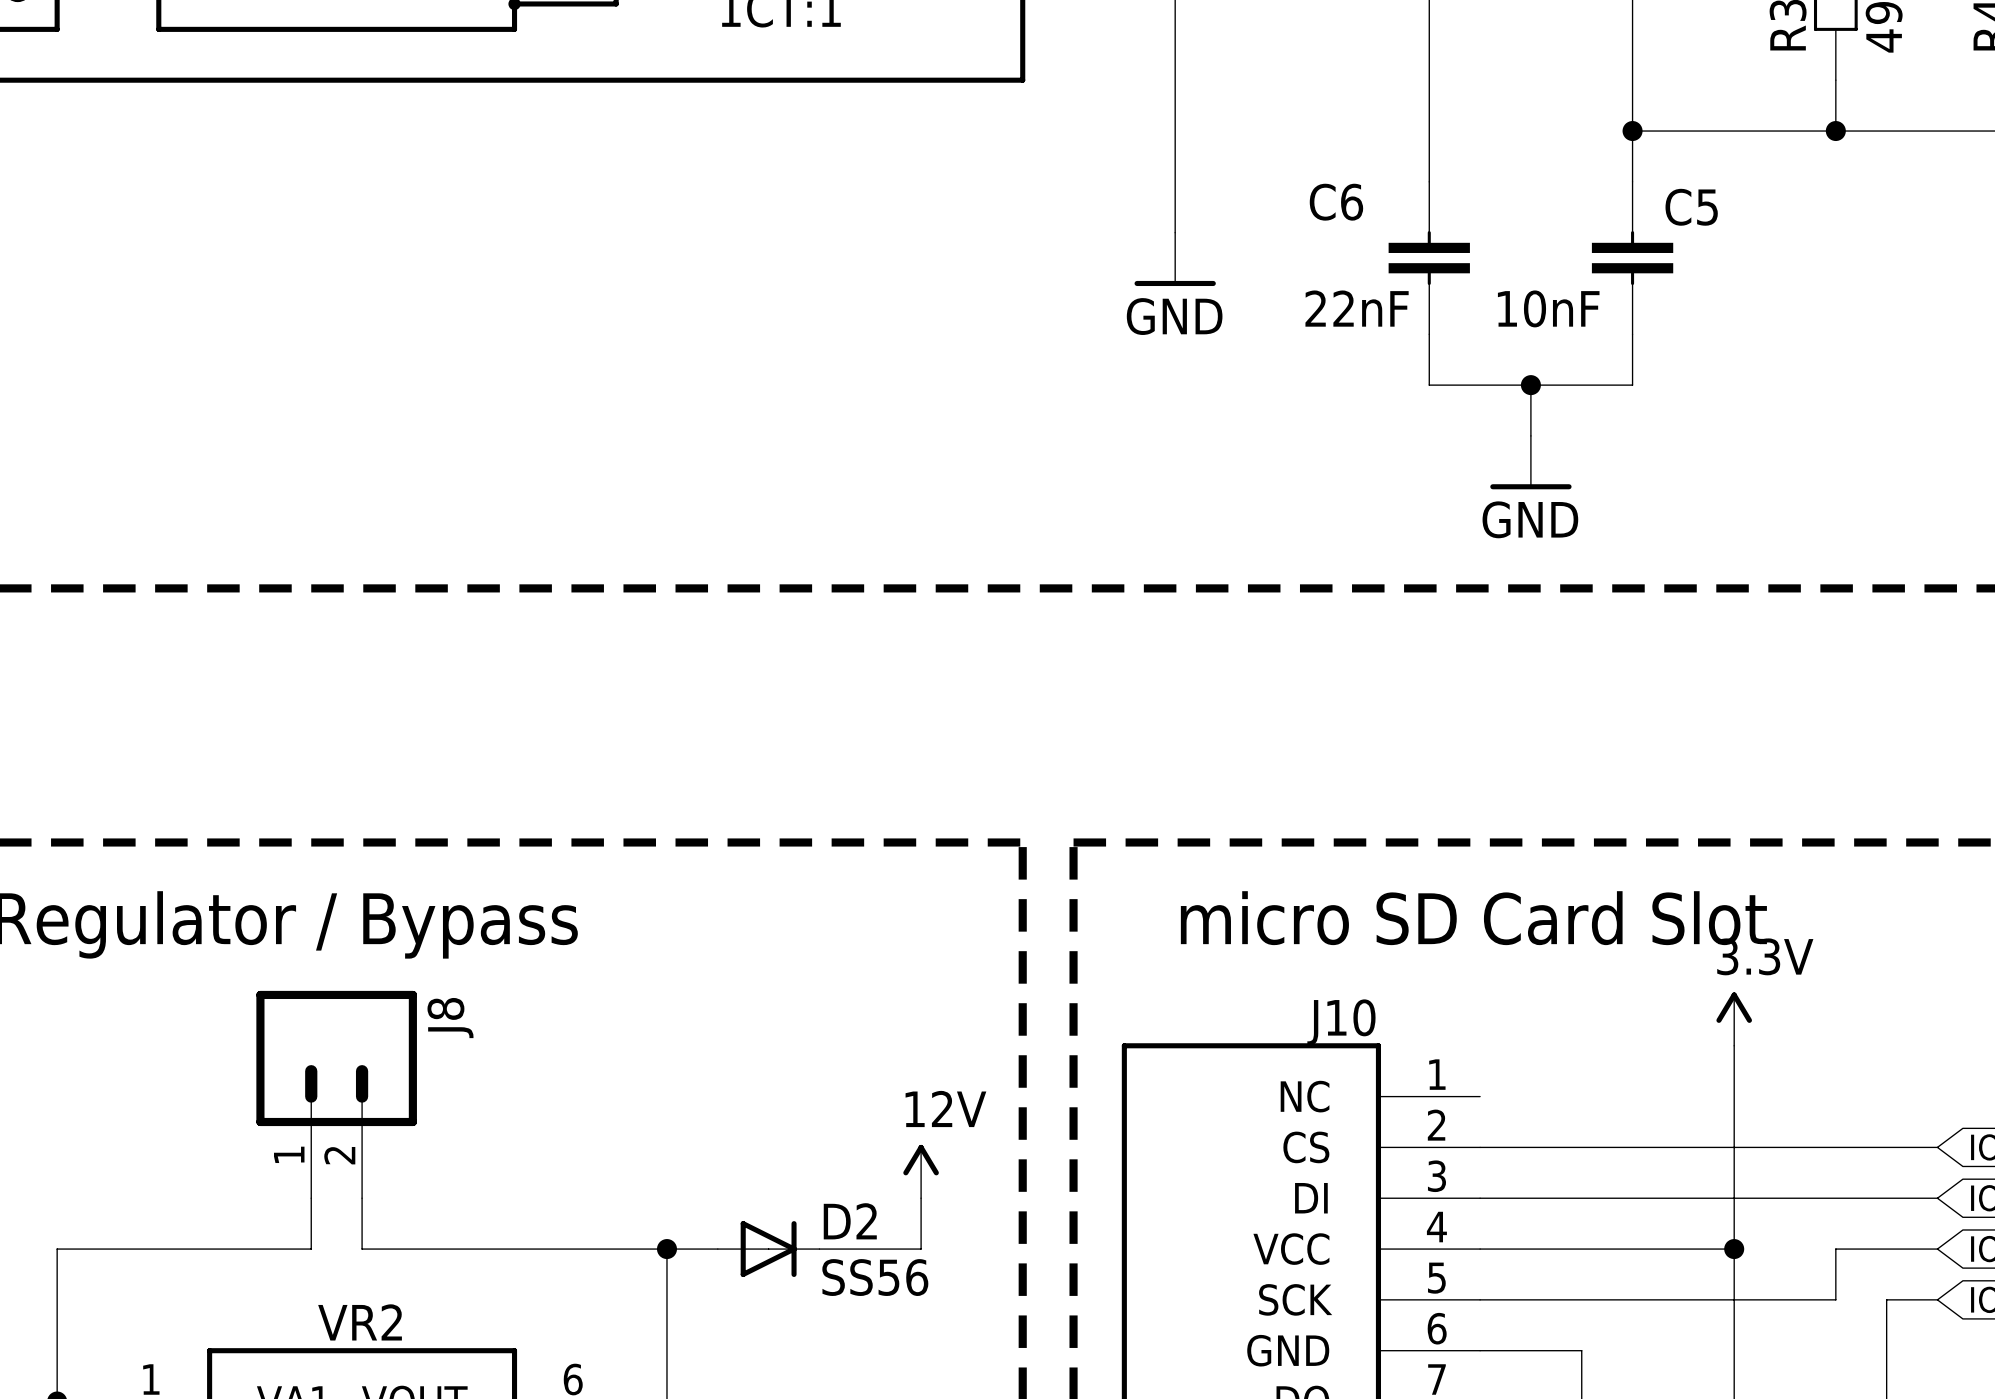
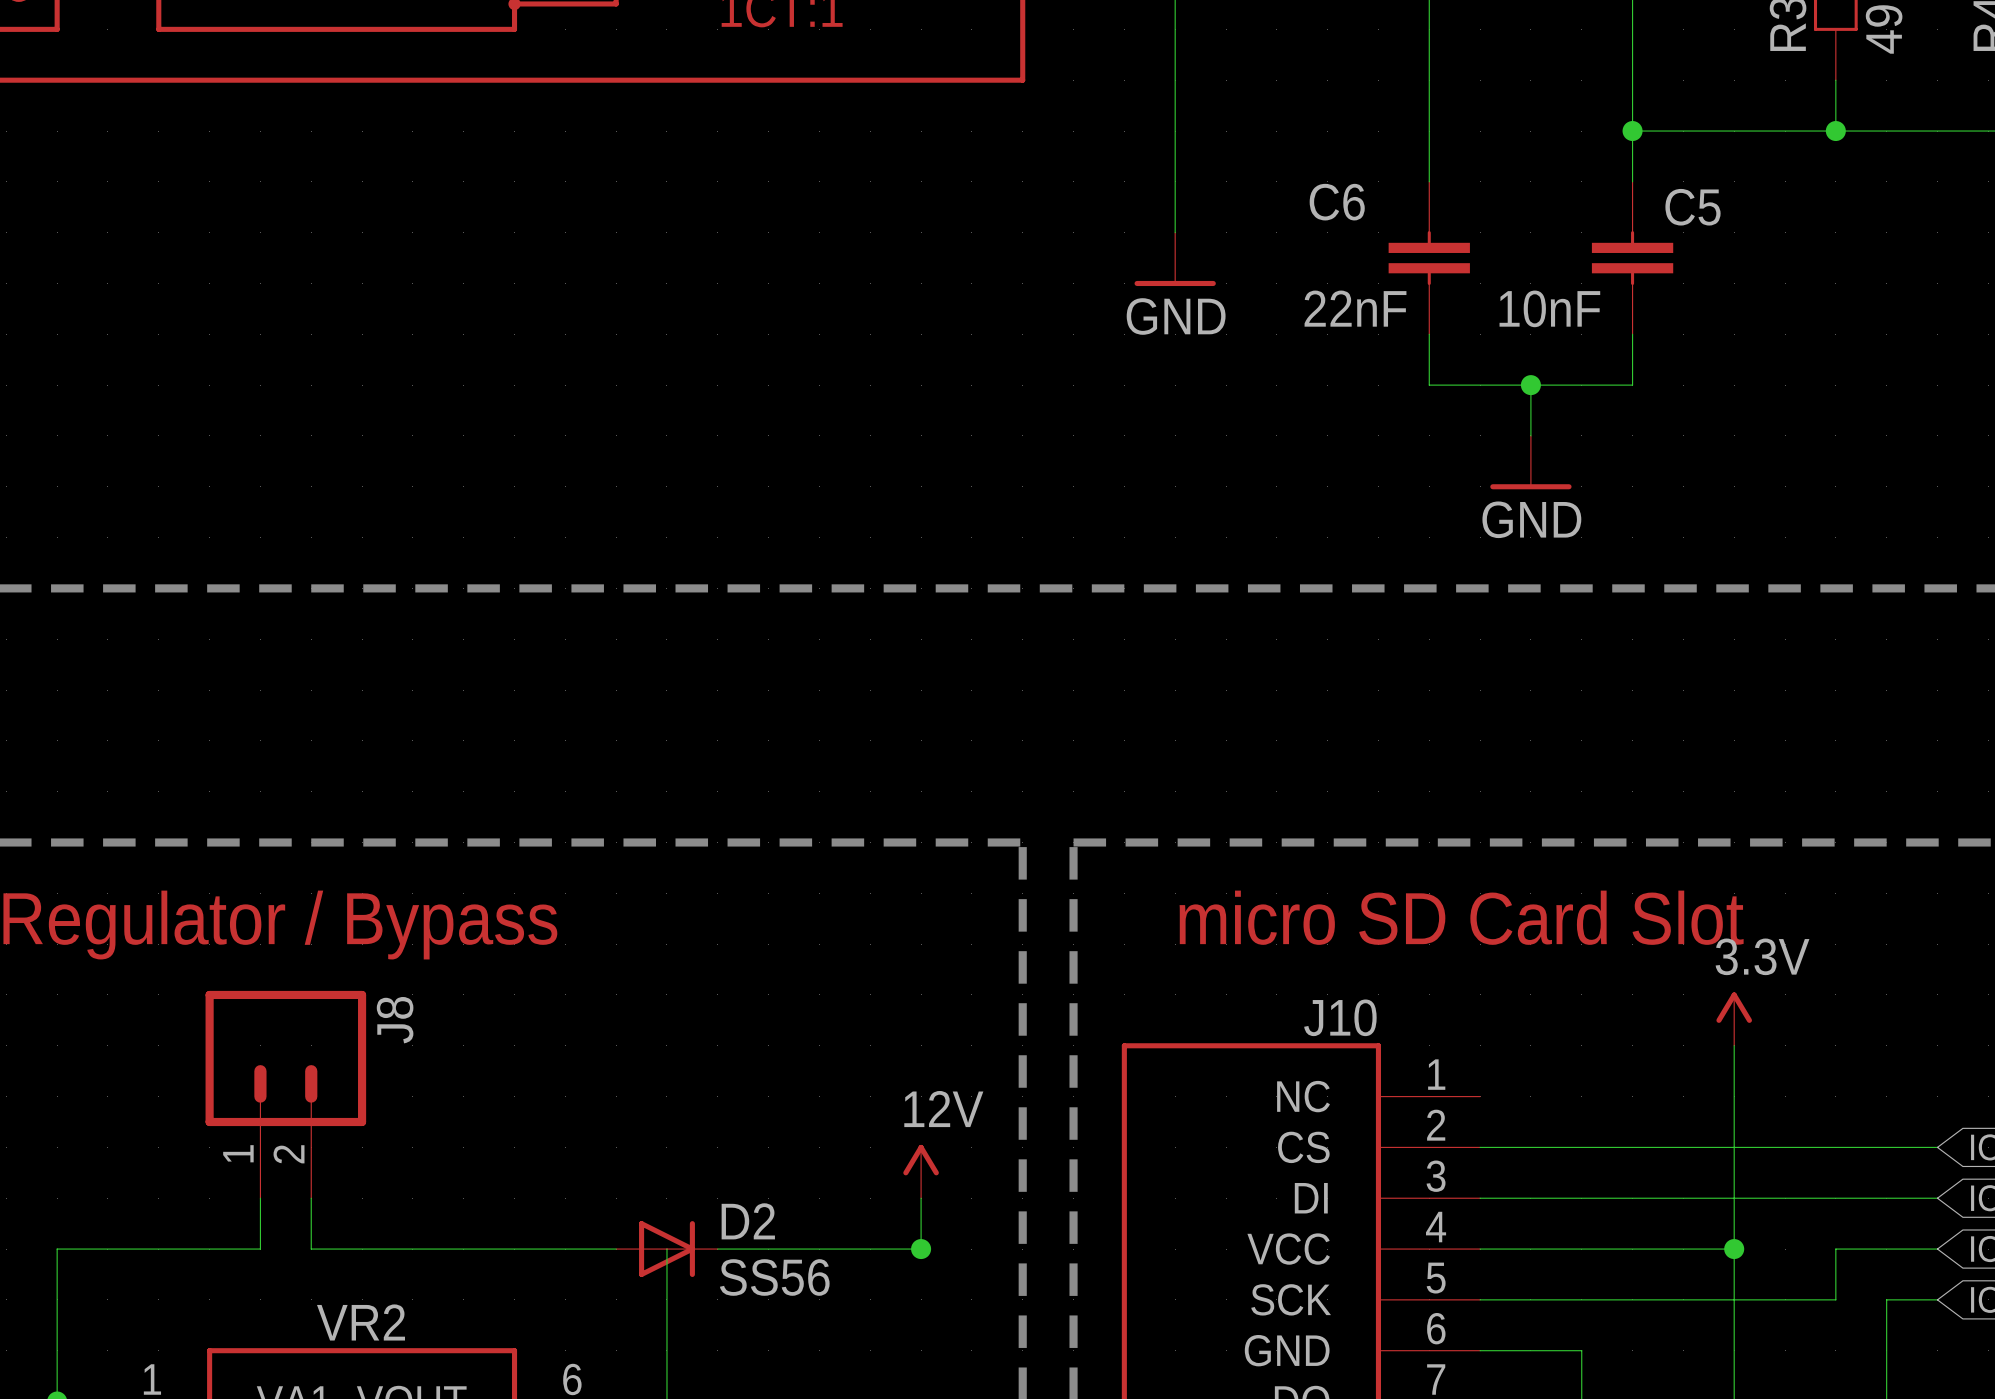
J8 position: (336, 1094) -> (285, 1094)
wire: (362, 1198) (362, 1249) -> (311, 1249) (362, 1249)
wire: (260, 1249) (311, 1249) -> (260, 1249) (260, 1198)
junction: (666, 1249) -> none
D2 position: (768, 1249) -> (666, 1249)
junction: none -> (921, 1249)

